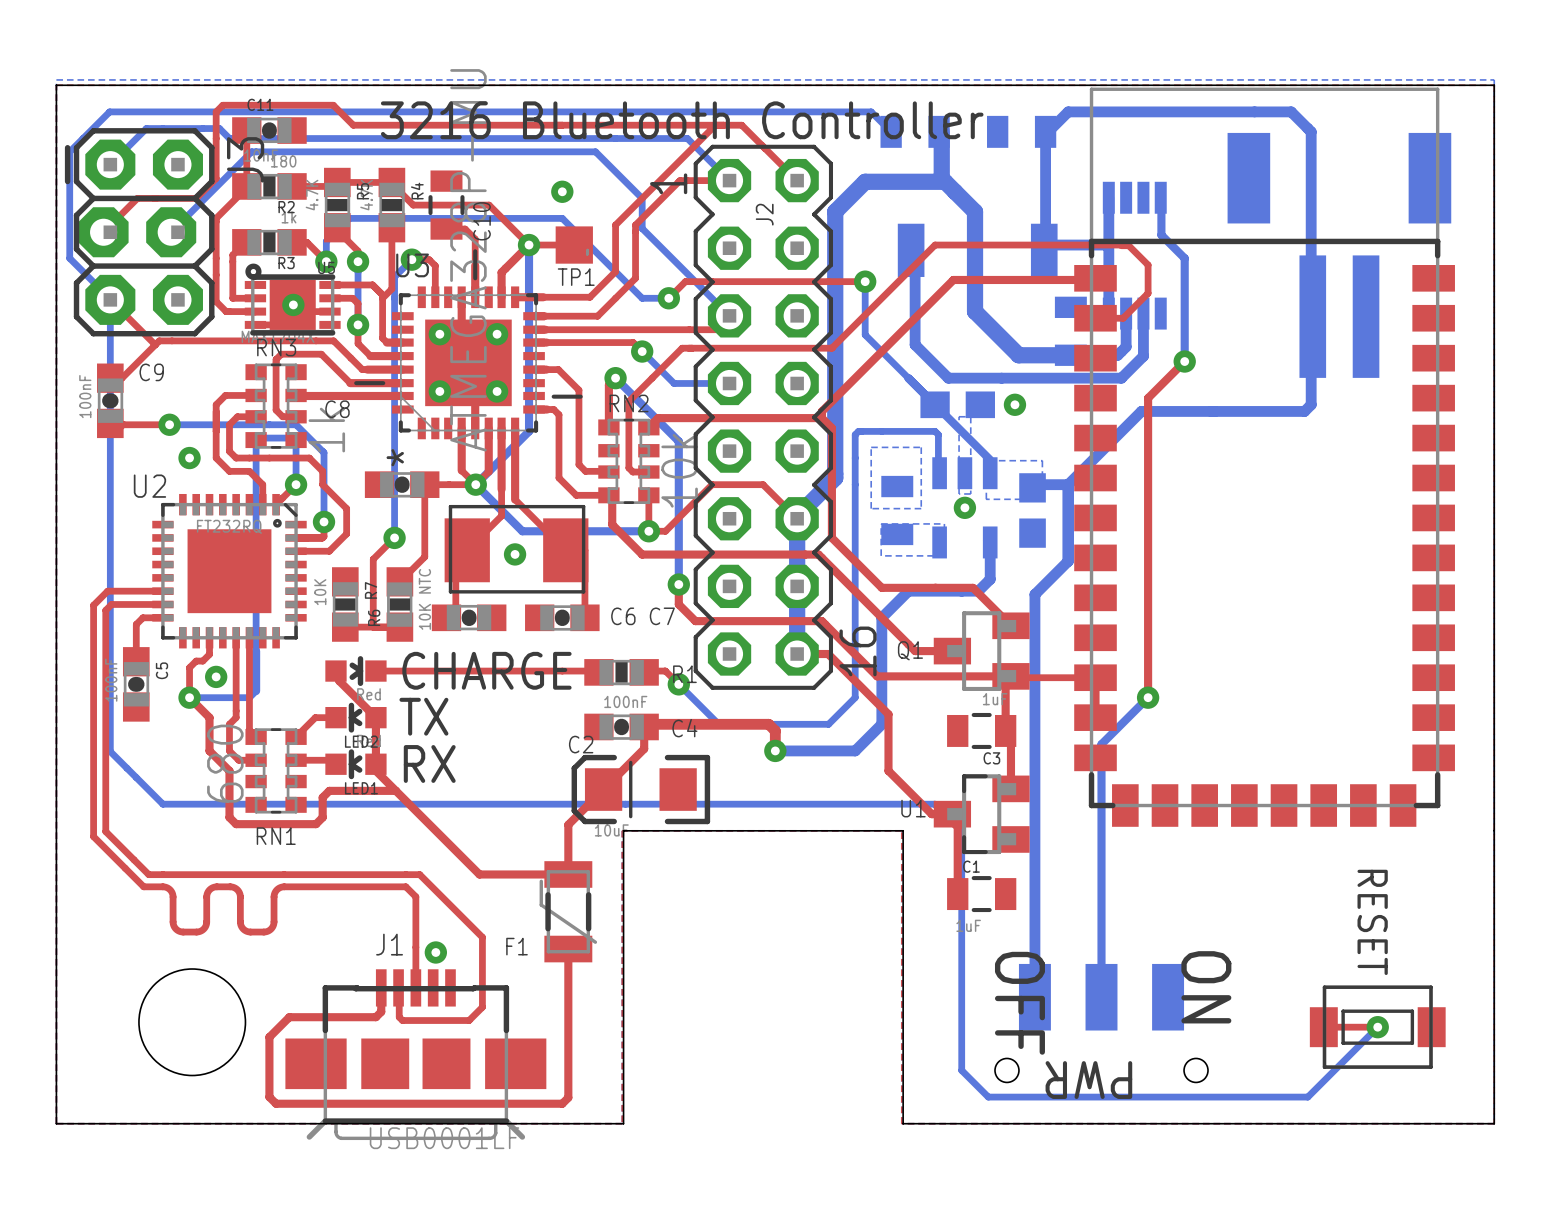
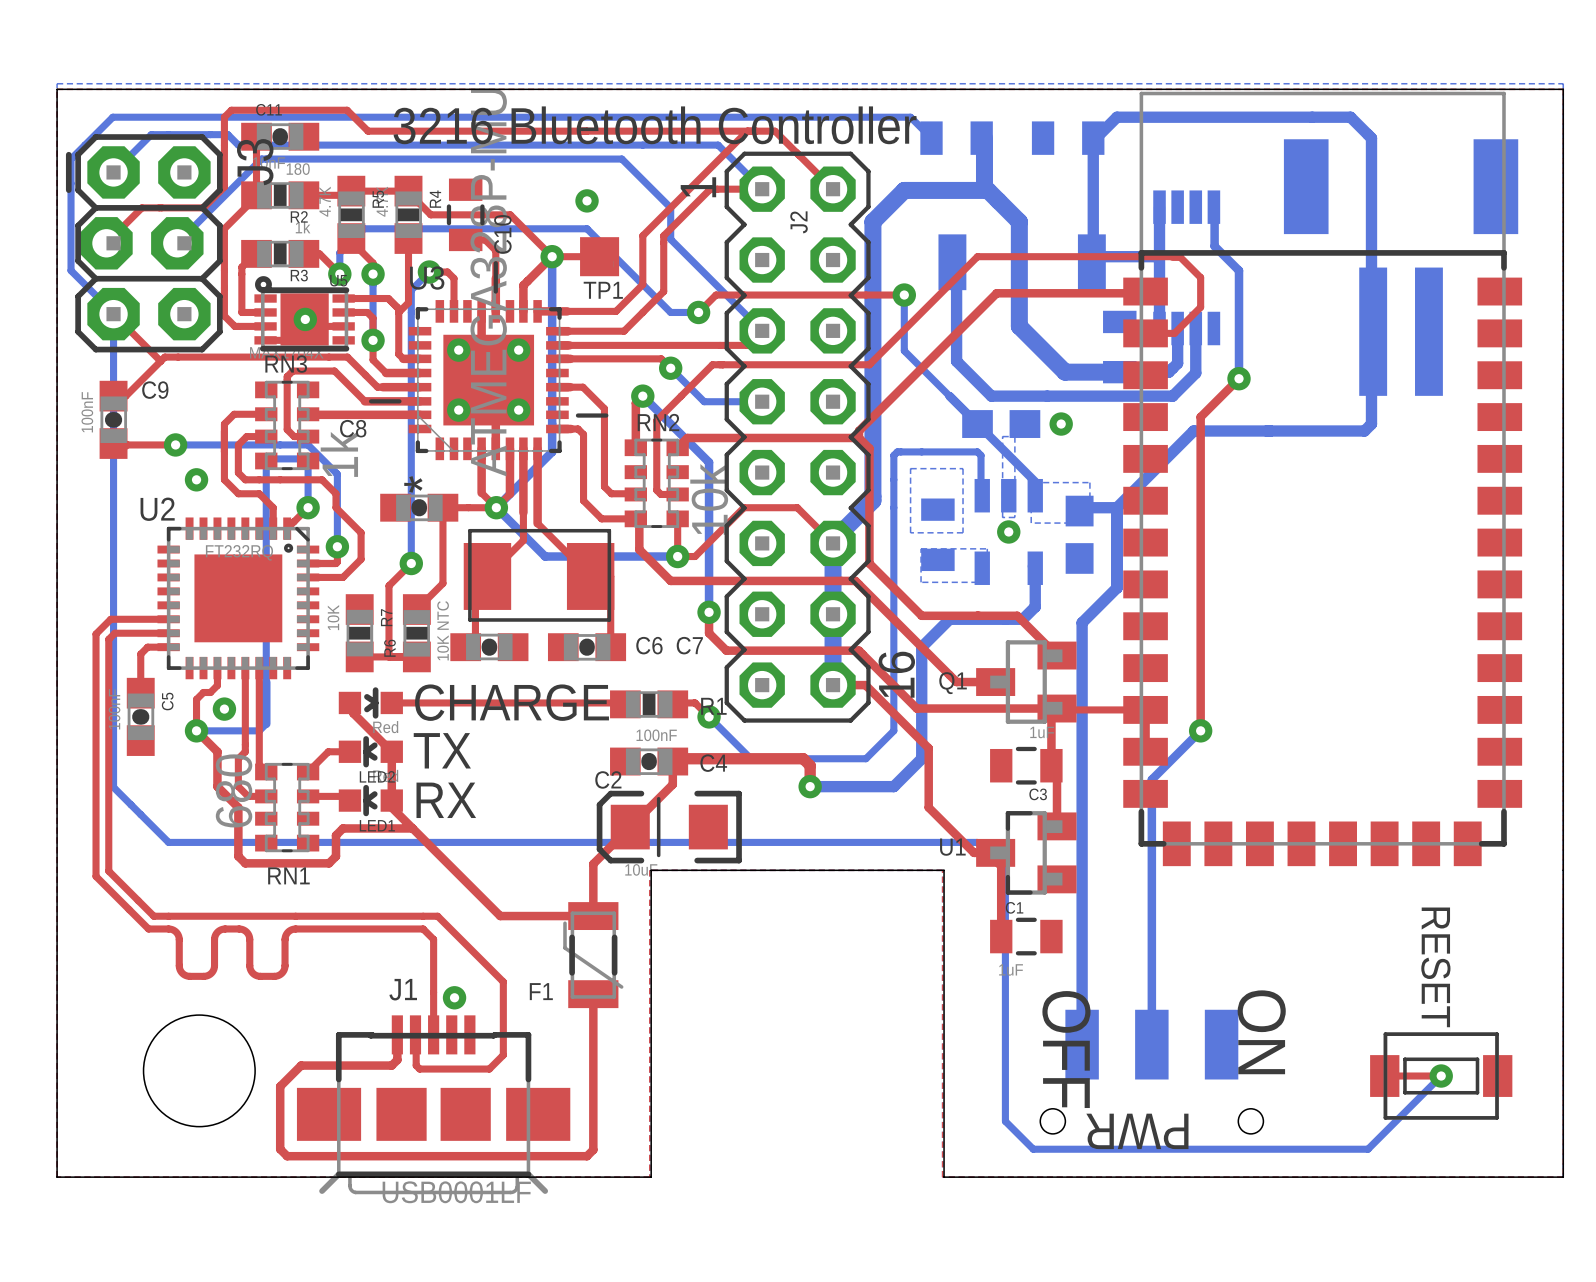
via: (515, 554) -> none

